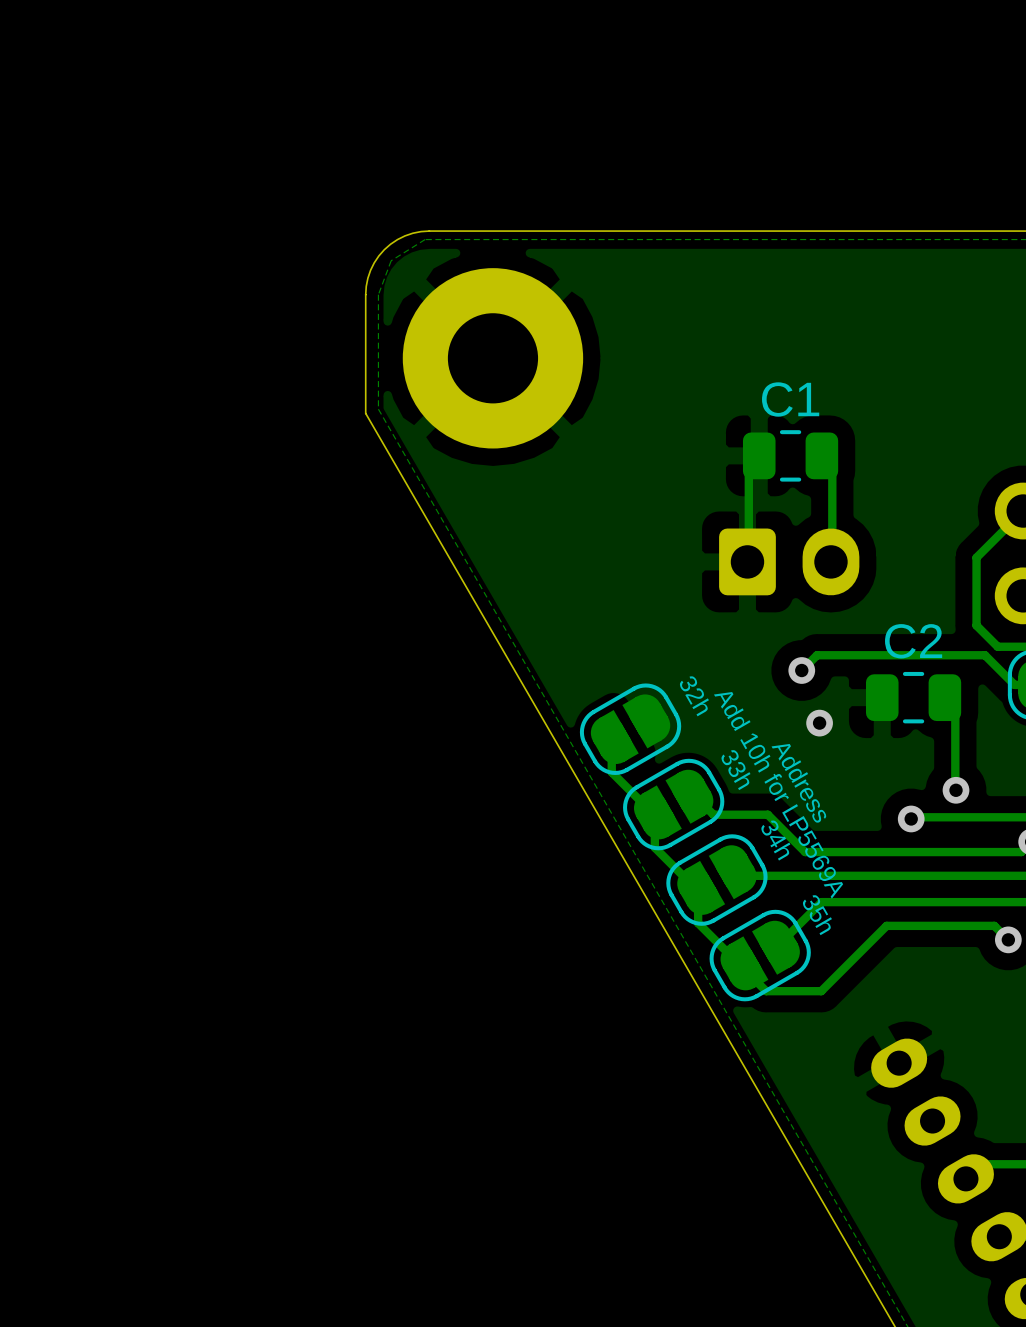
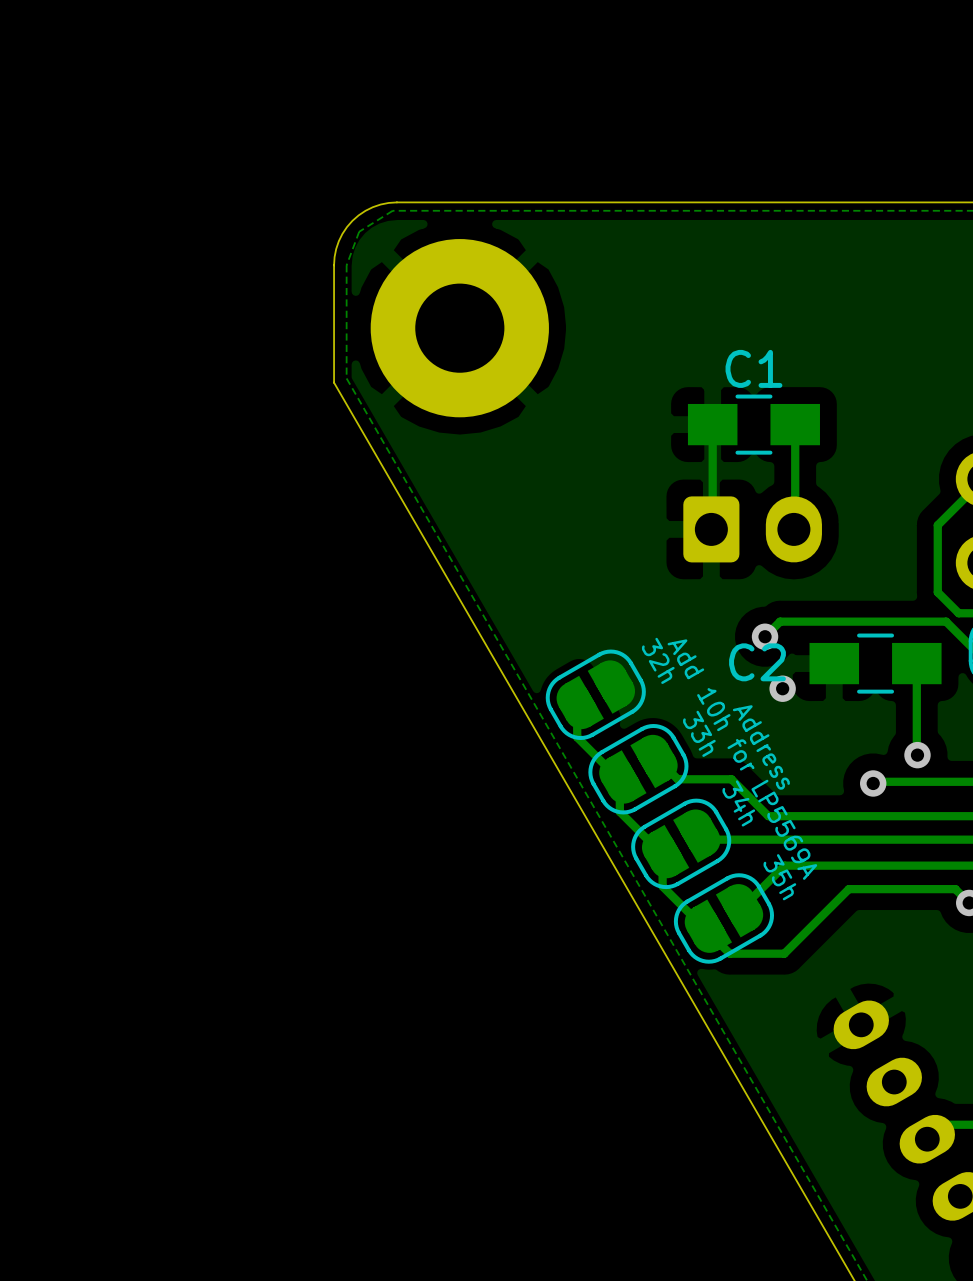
C1 footprint: [742, 430, 839, 482] -> [687, 394, 820, 455]
C2 name position: C2 (913, 641) -> C2 (757, 662)
C2 footprint: [865, 671, 962, 724] -> [809, 633, 942, 694]

